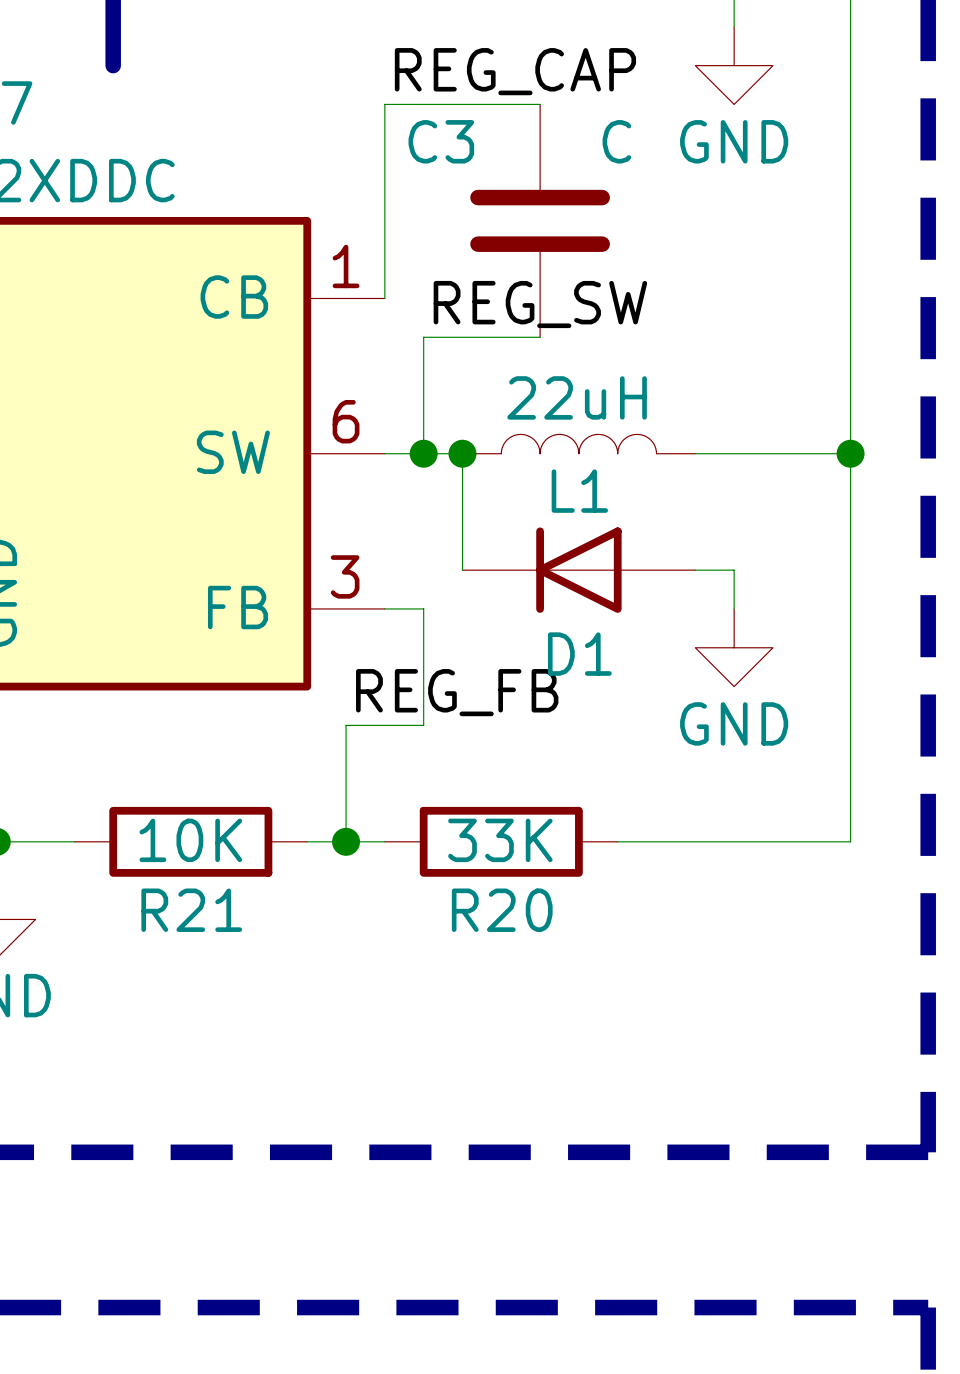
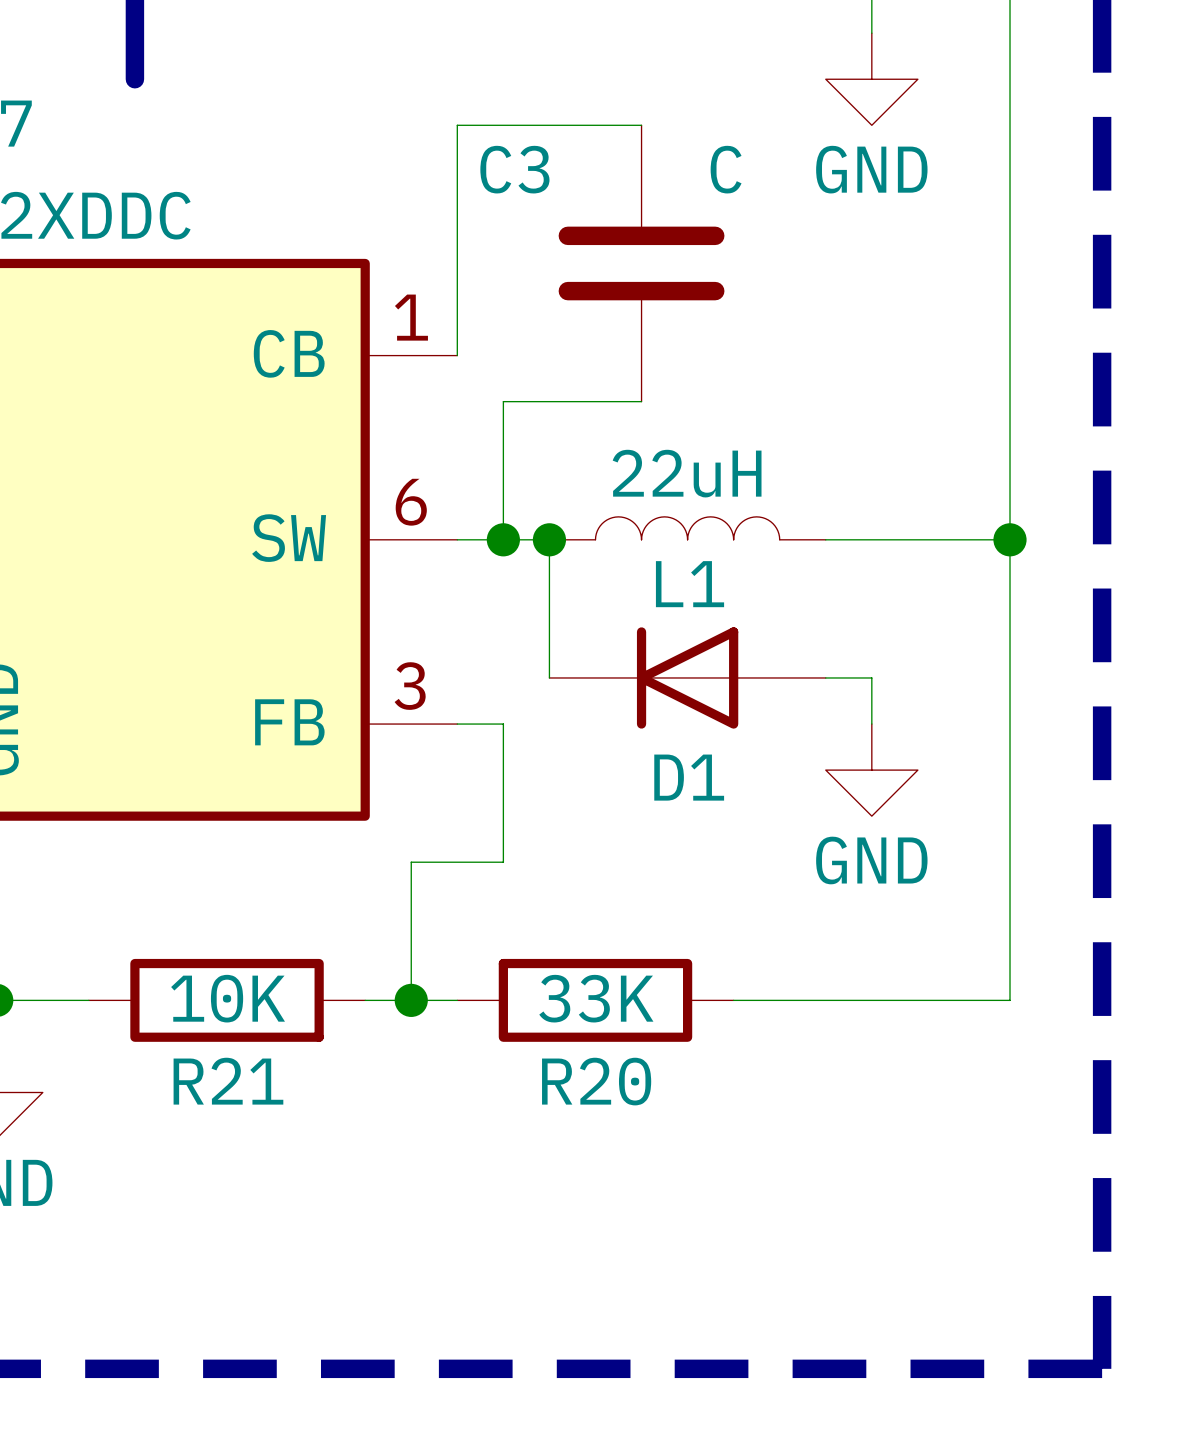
label: REG_CAP (515, 71) -> none
label: REG_SW (540, 304) -> none
label: REG_FB (457, 692) -> none

